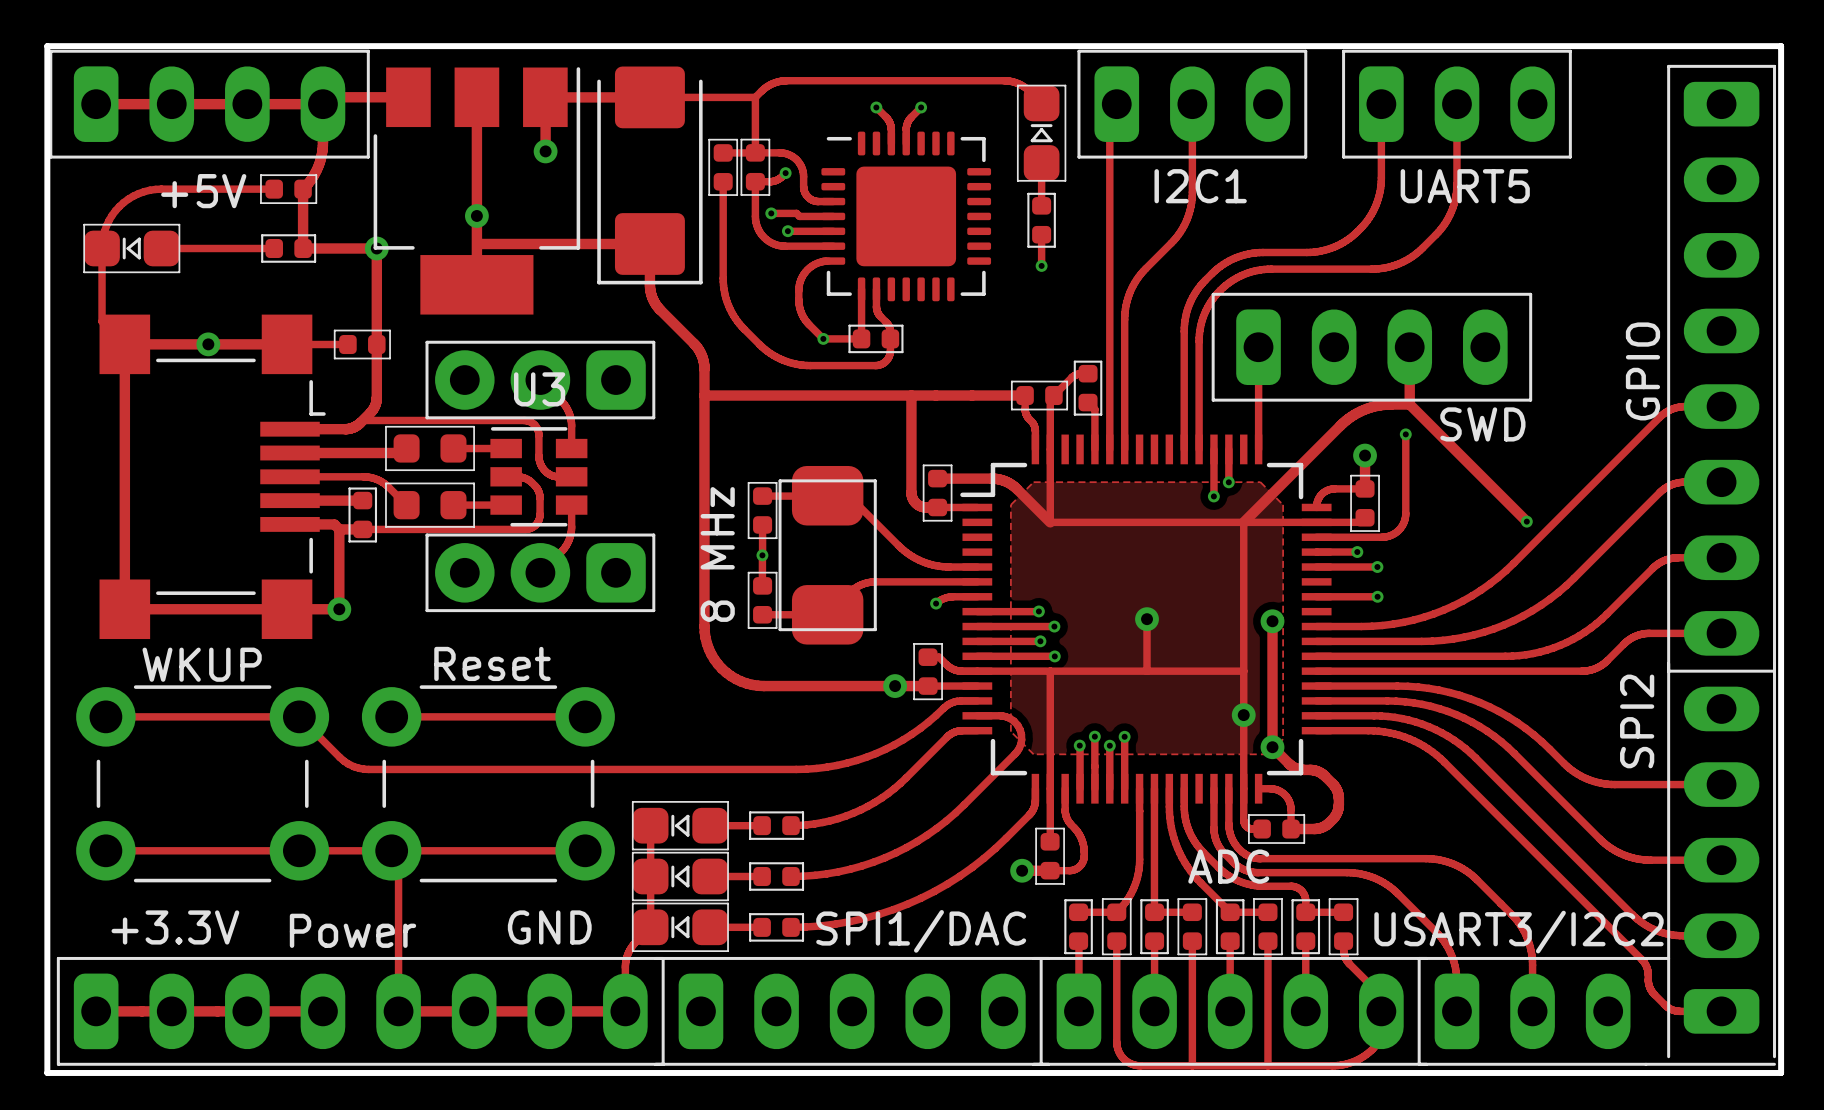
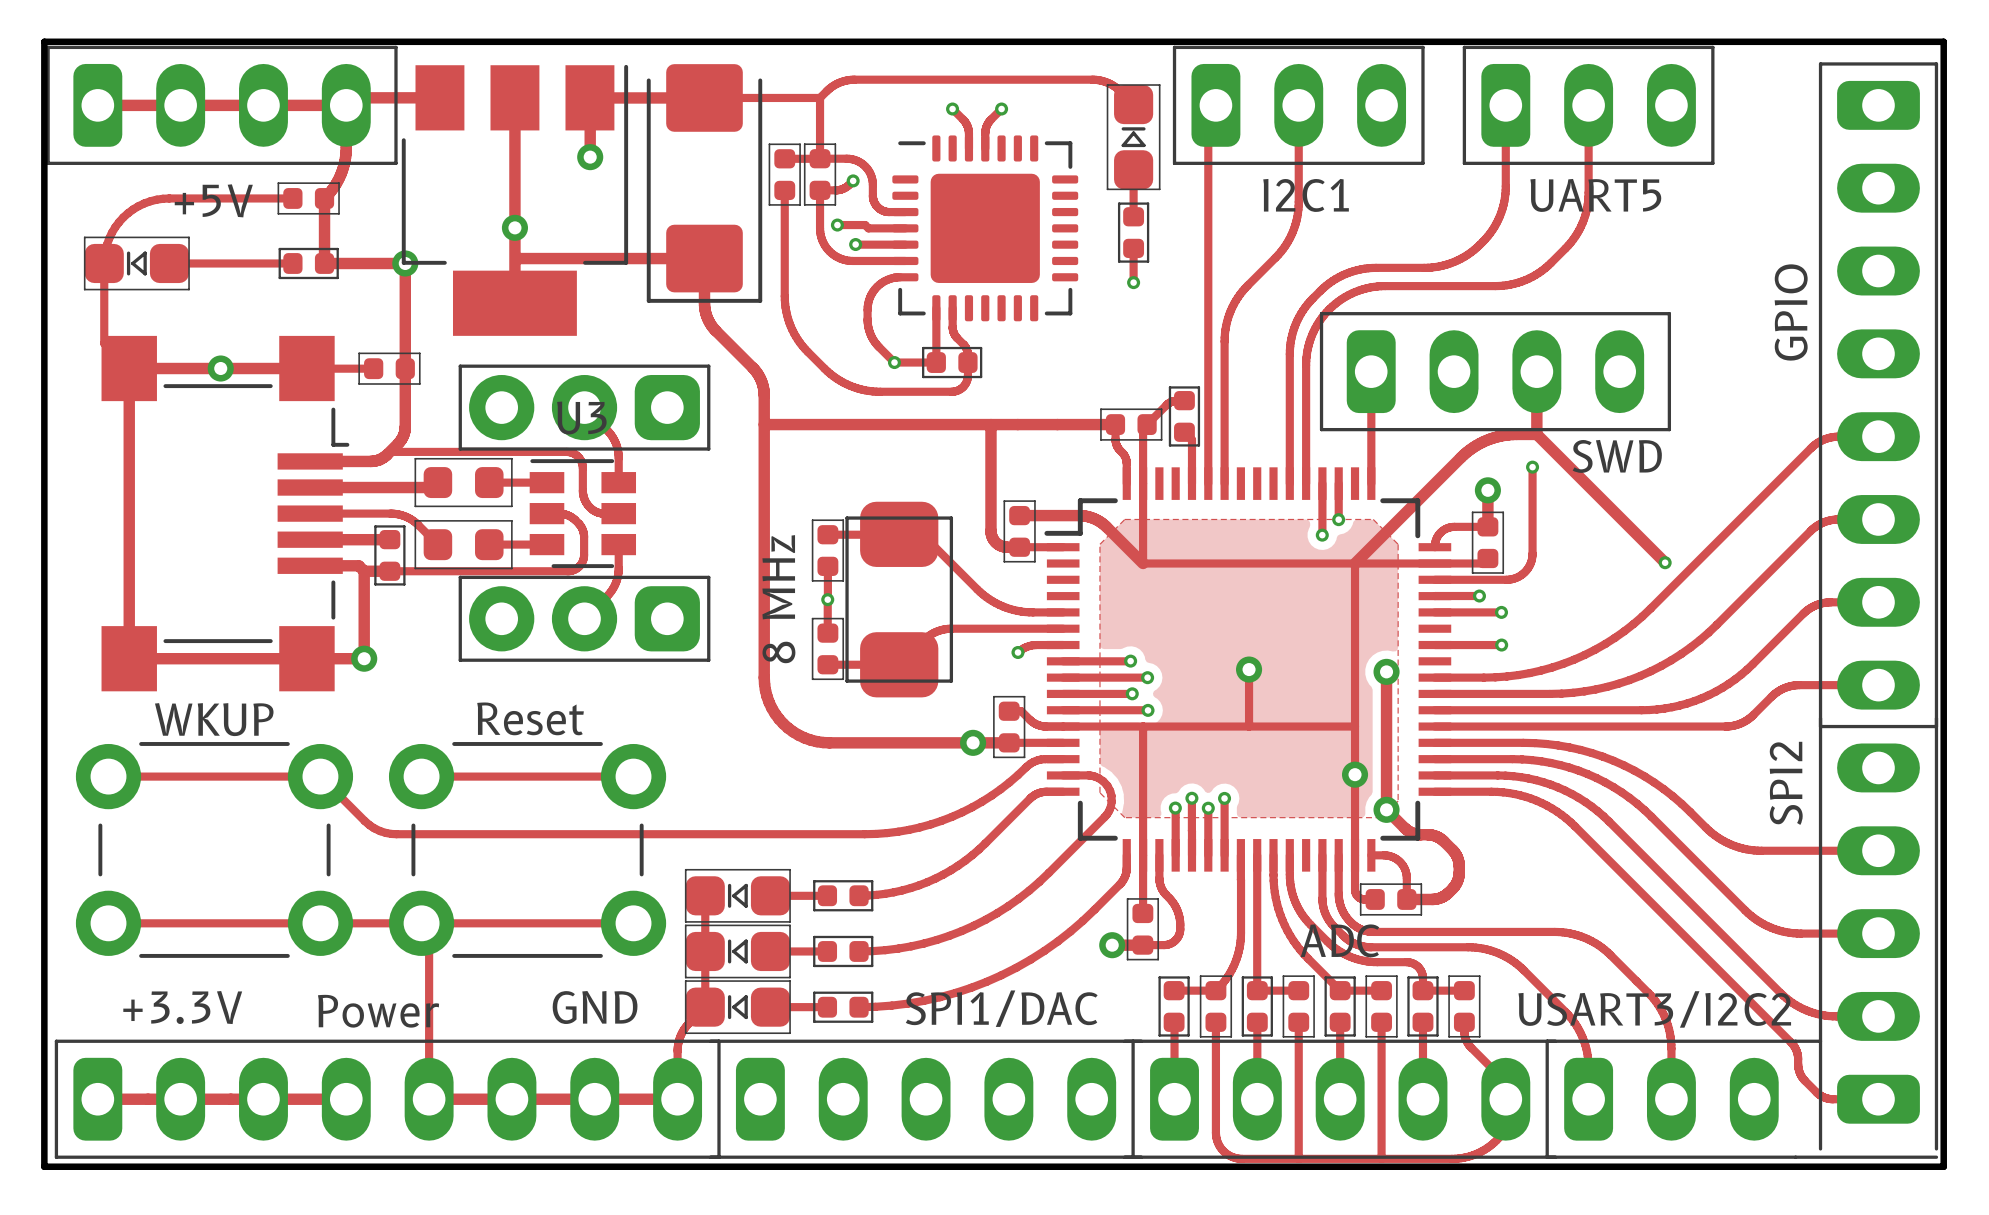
part value position: GPIO (1642, 371) -> GPIO (1791, 312)

